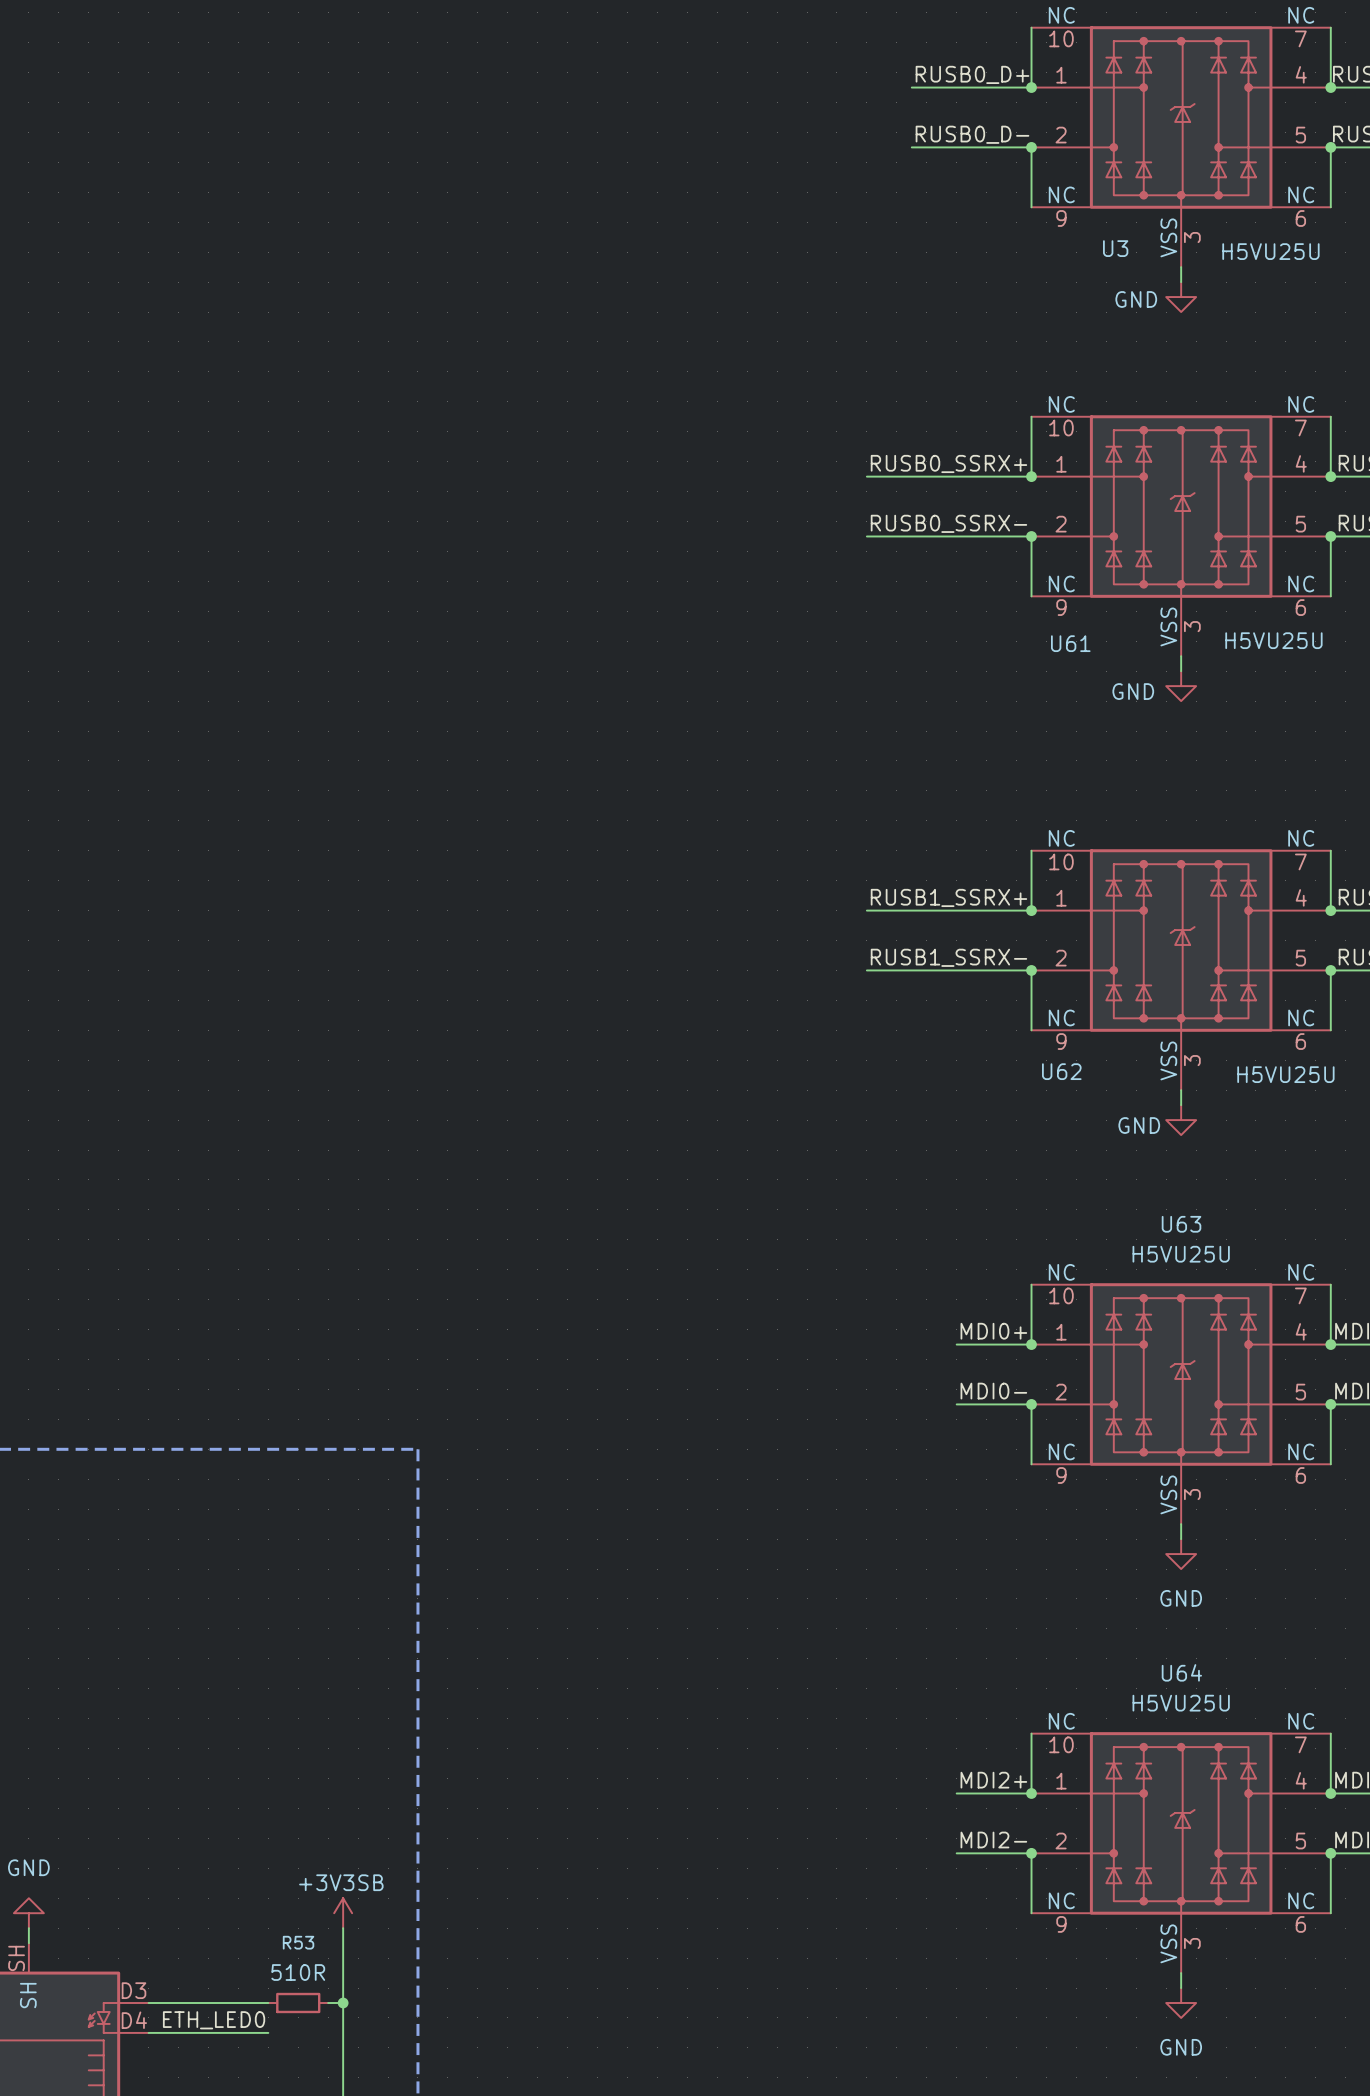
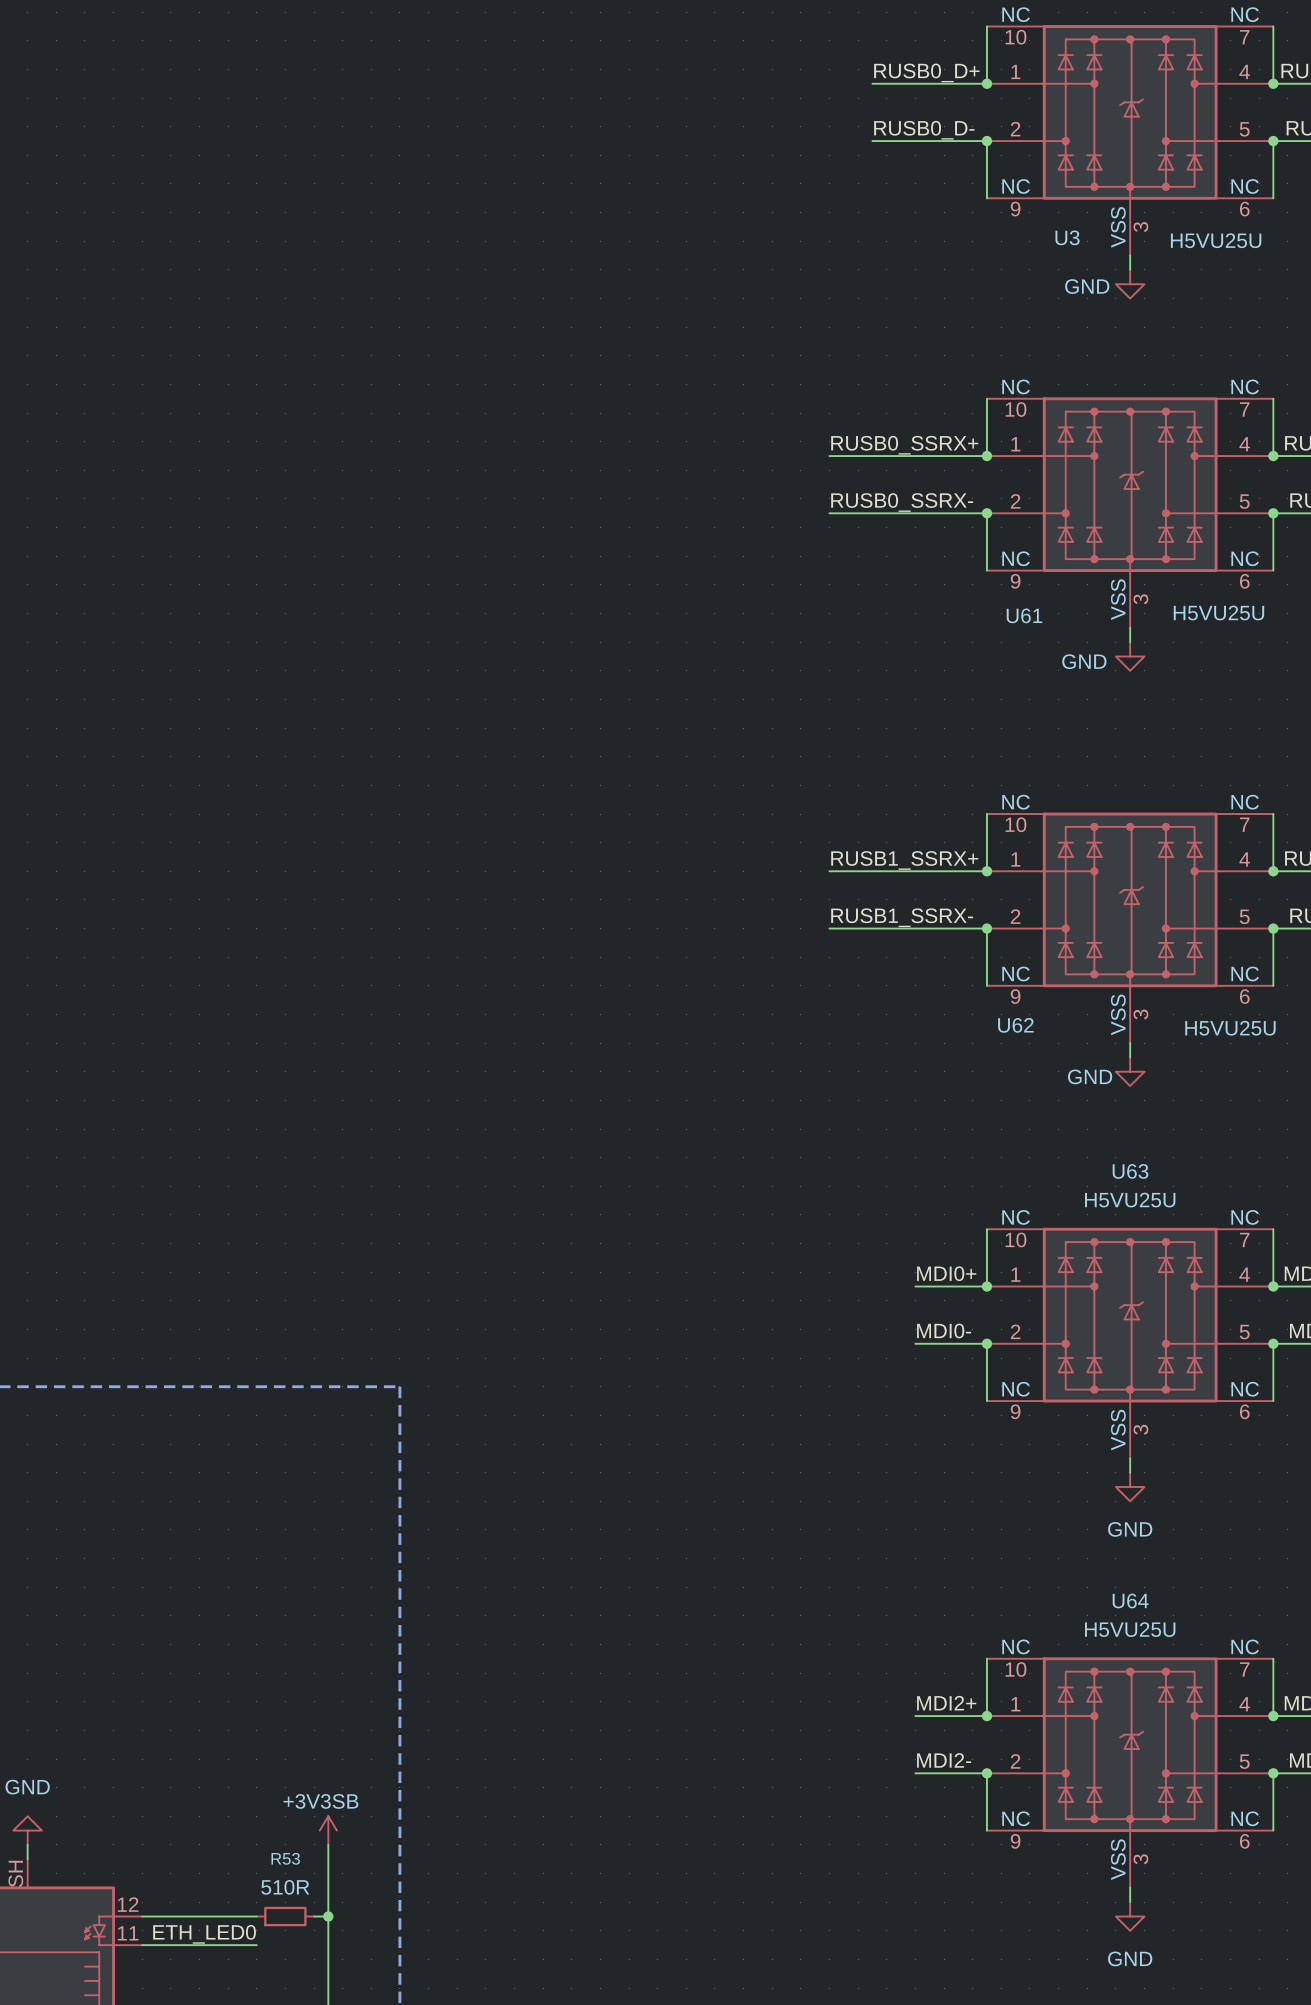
part pin number: D3 (134, 1990) -> 12 (128, 1904)
part pin name: SH (28, 1995) -> none
part pin number: D4 (134, 2020) -> 11 (128, 1933)

